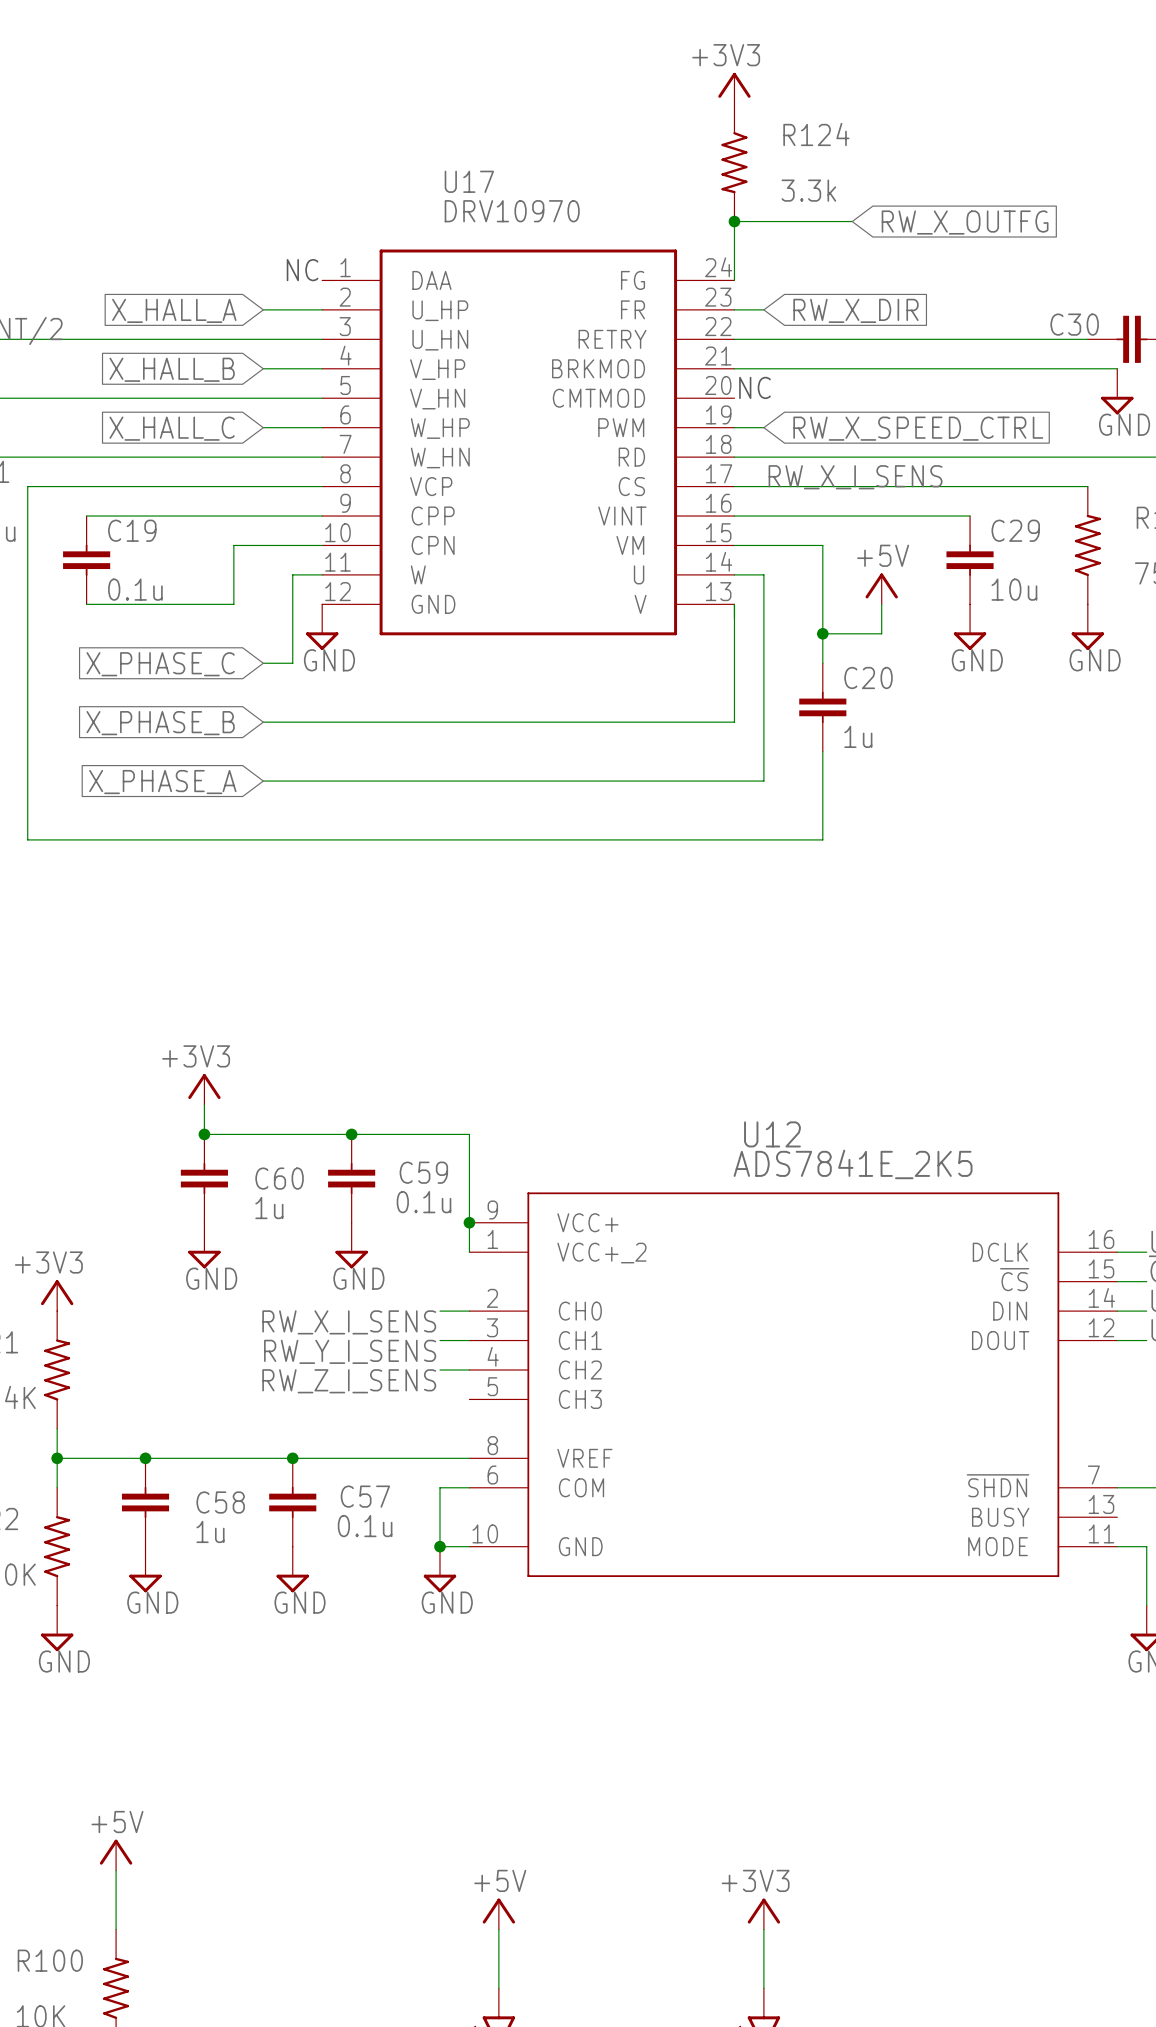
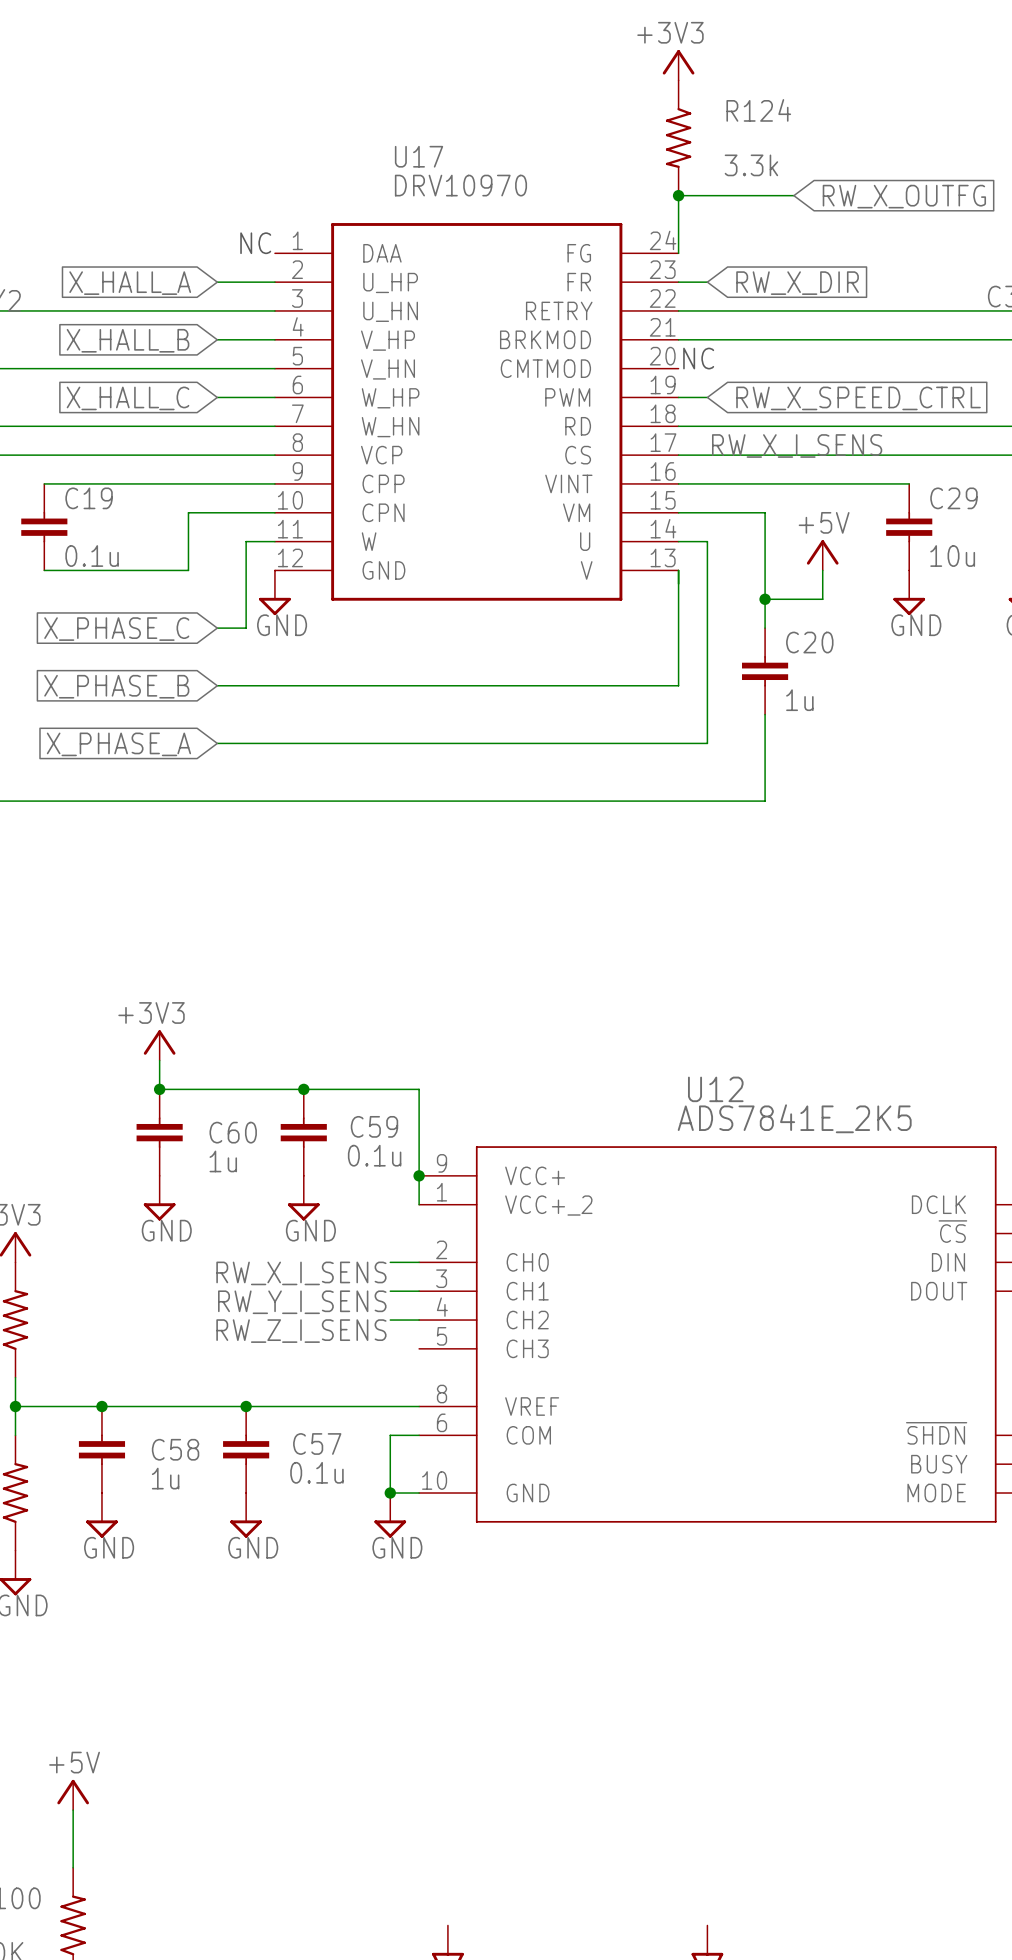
power symbol: +5V (498, 1914) -> none
power symbol: +3V3 (763, 1914) -> none
wire: (498, 1929) (498, 1988) -> none
wire: (763, 1929) (763, 1988) -> none

